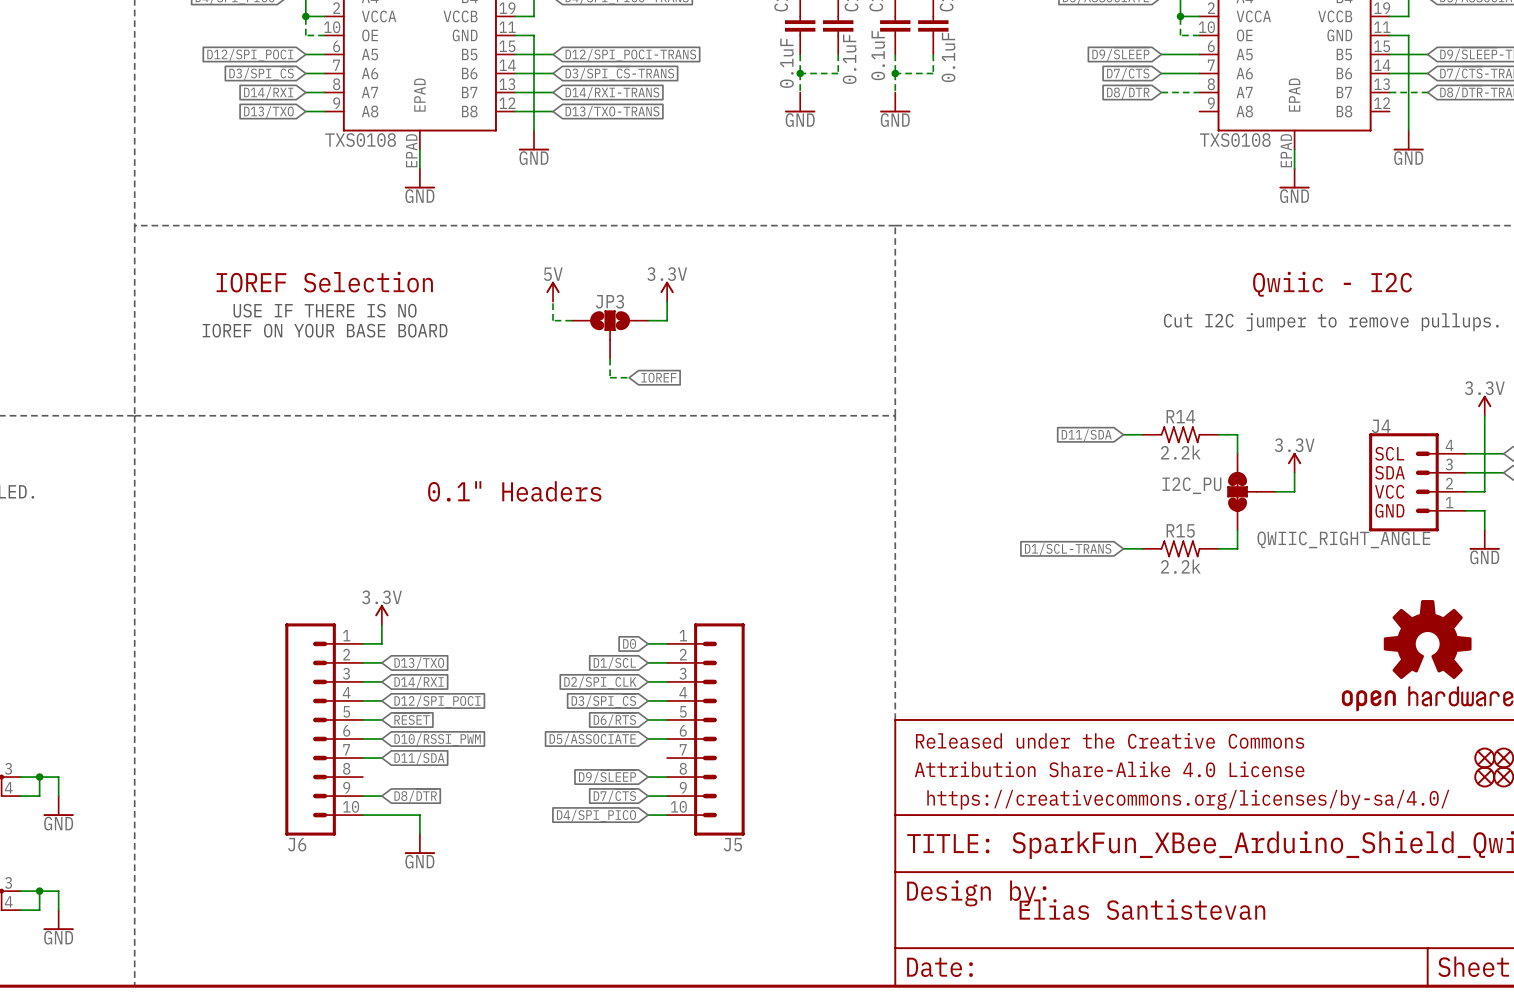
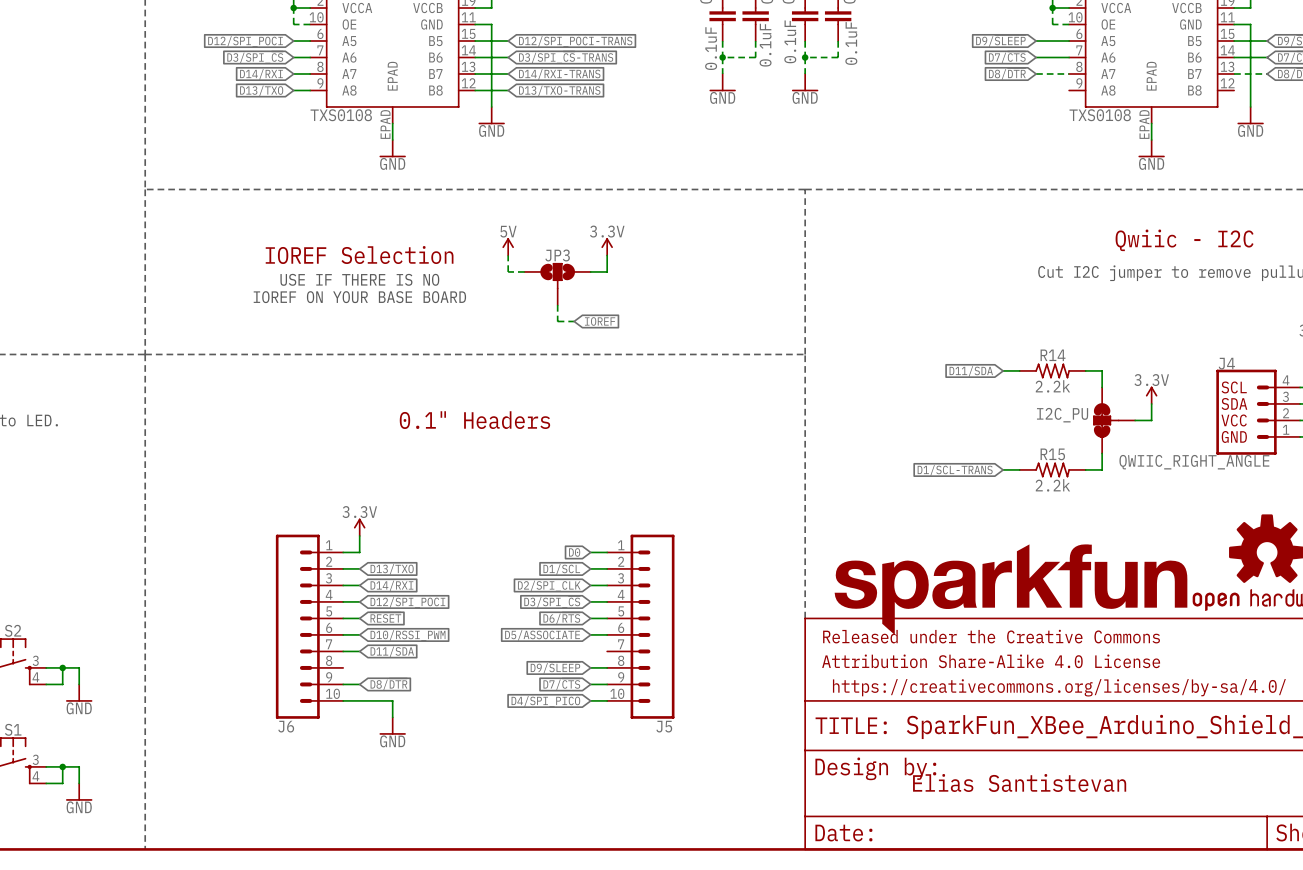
text position: IOREF Selection (324, 282) -> IOREF Selection (359, 255)
text position: USE IF THERE IS NO (325, 310) -> USE IF THERE IS NO (359, 279)
text position: IOREF ON YOUR BASE BOARD (325, 330) -> IOREF ON YOUR BASE BOARD (359, 297)
part: none -> (1010, 589)

